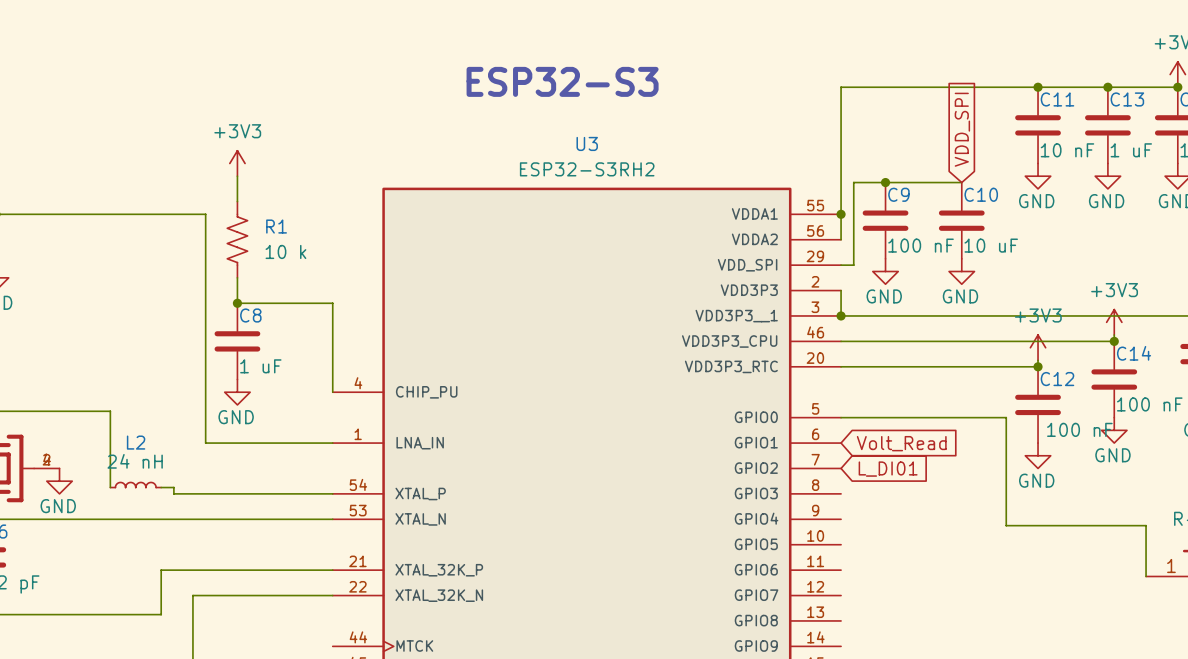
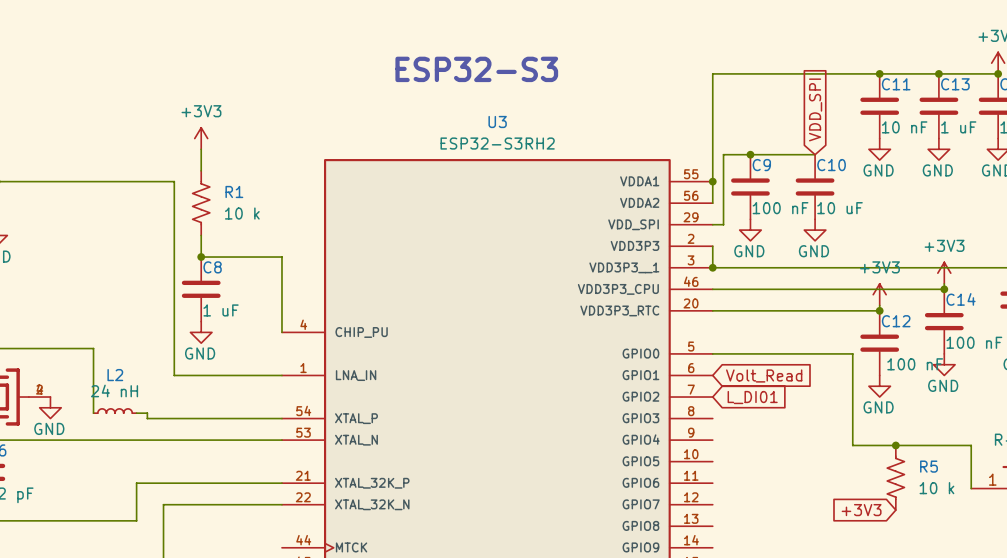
junction: none -> (895, 445)
R5: none -> 10 k (895, 477)
global label: none -> +3V3 (861, 510)

